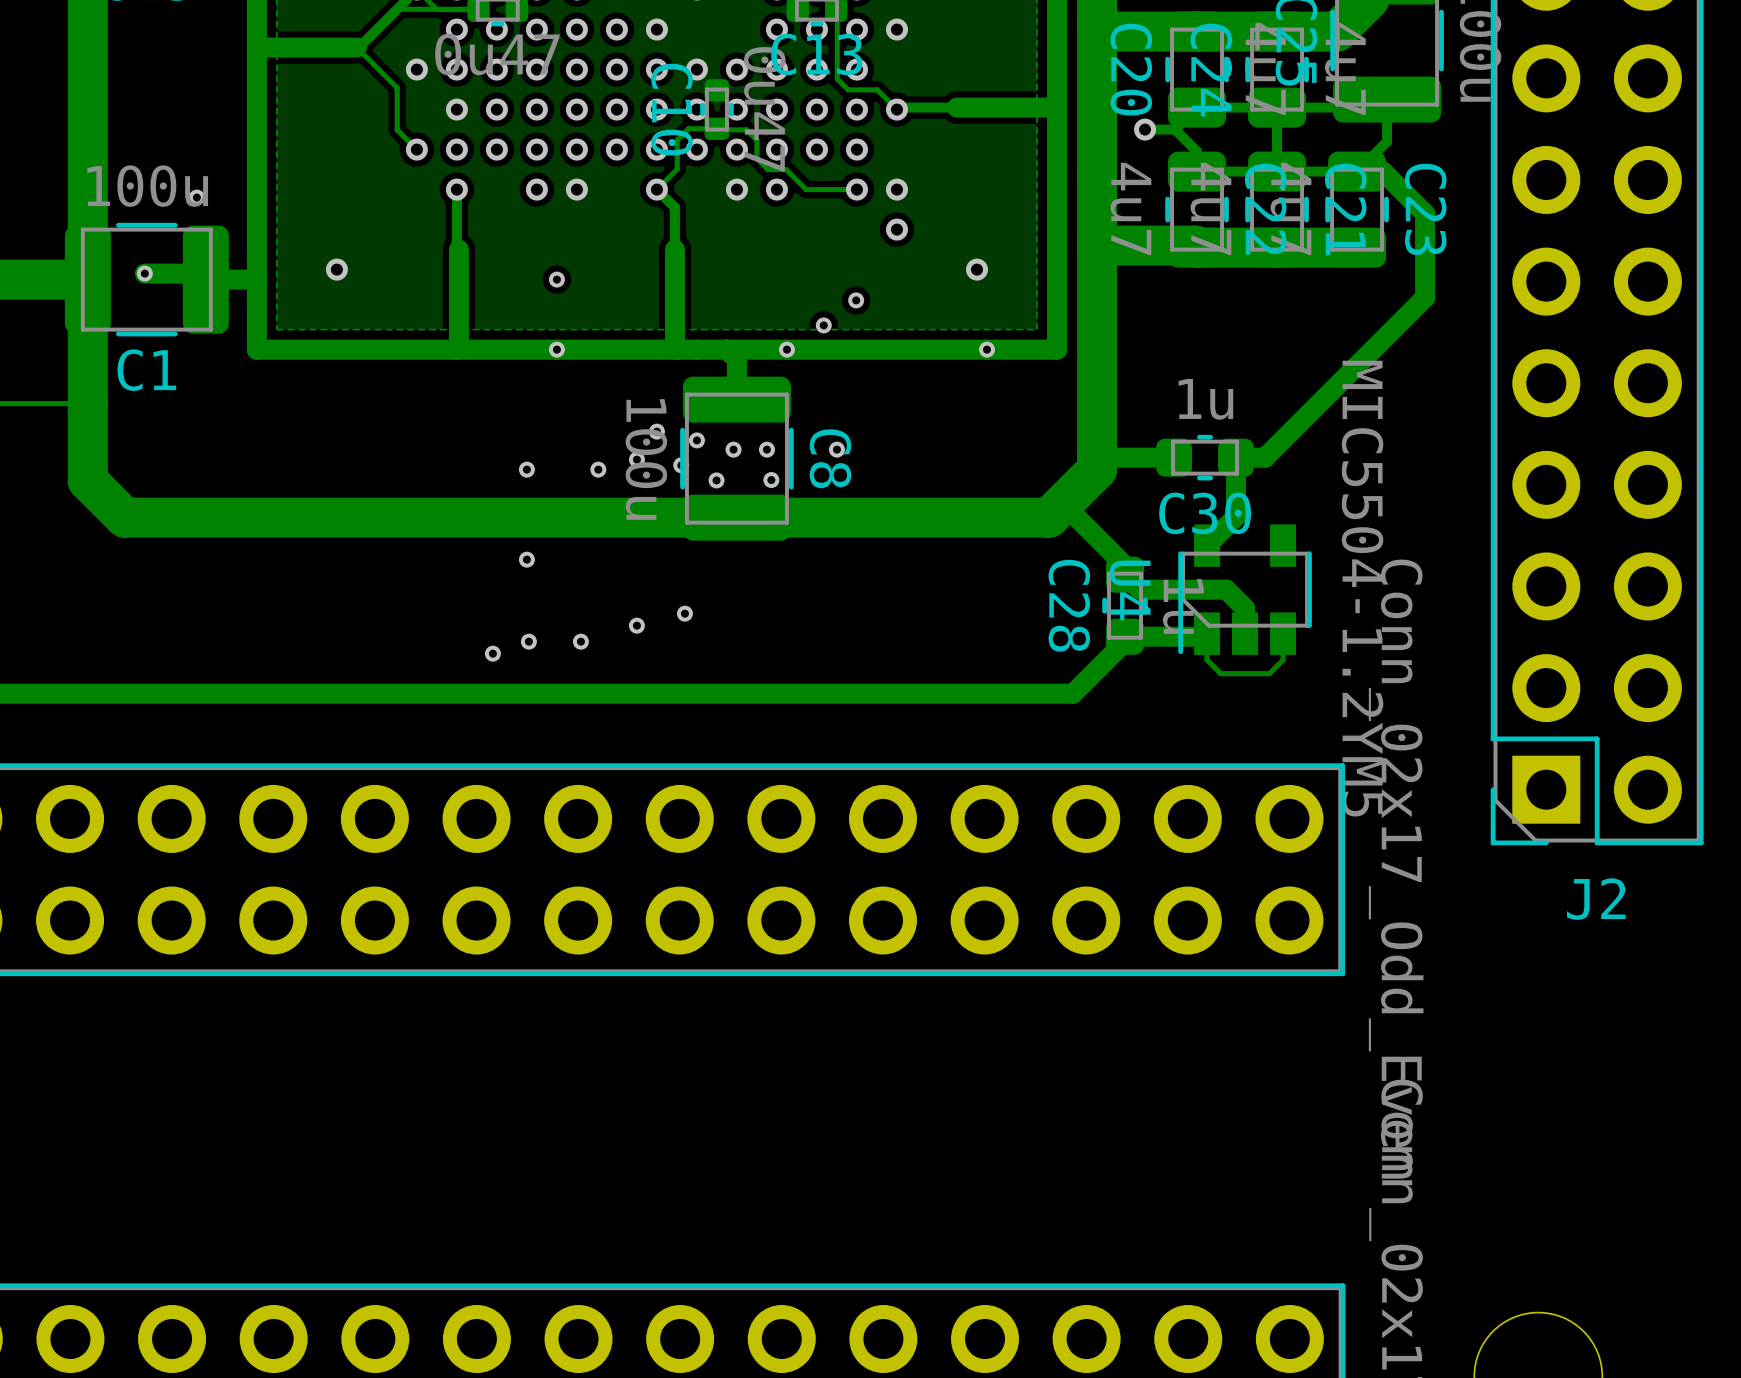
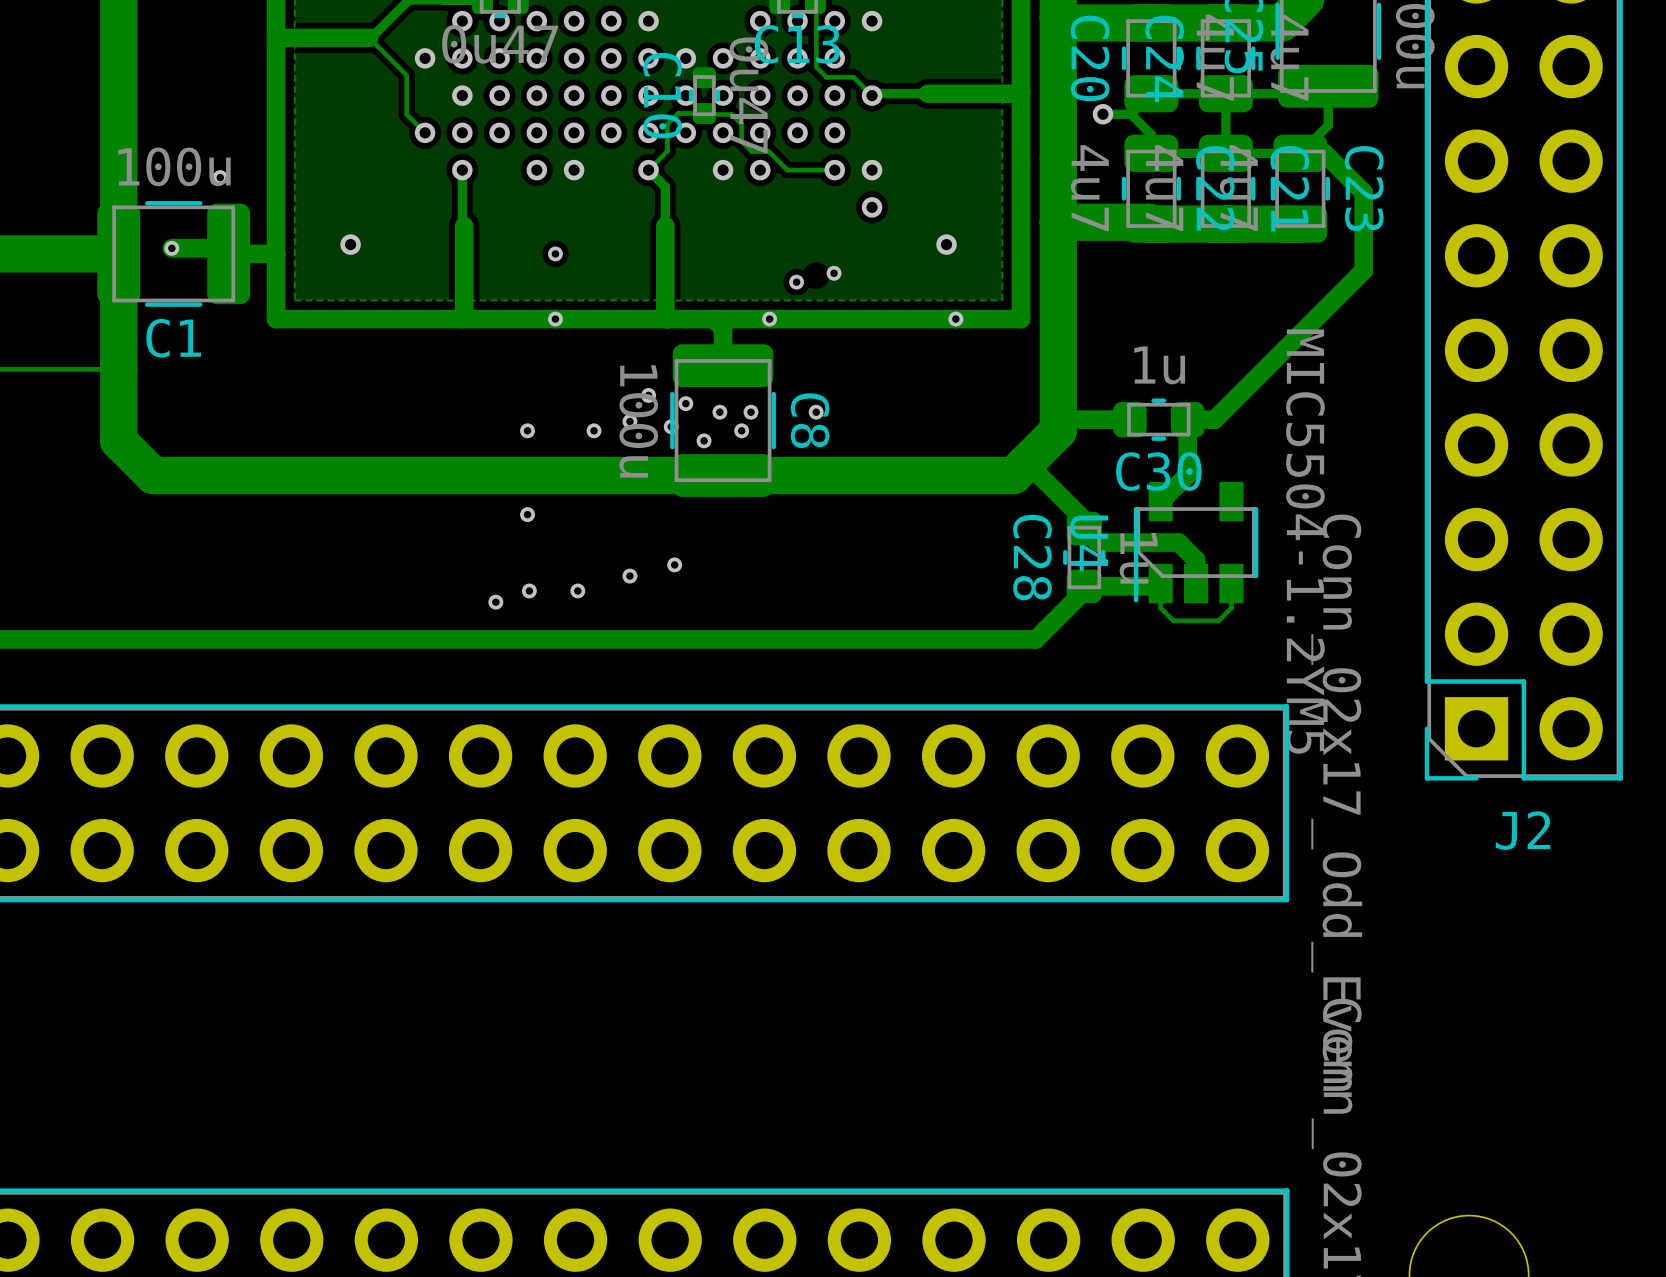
via position: (823, 325) -> (796, 282)
via position: (771, 480) -> (741, 430)

